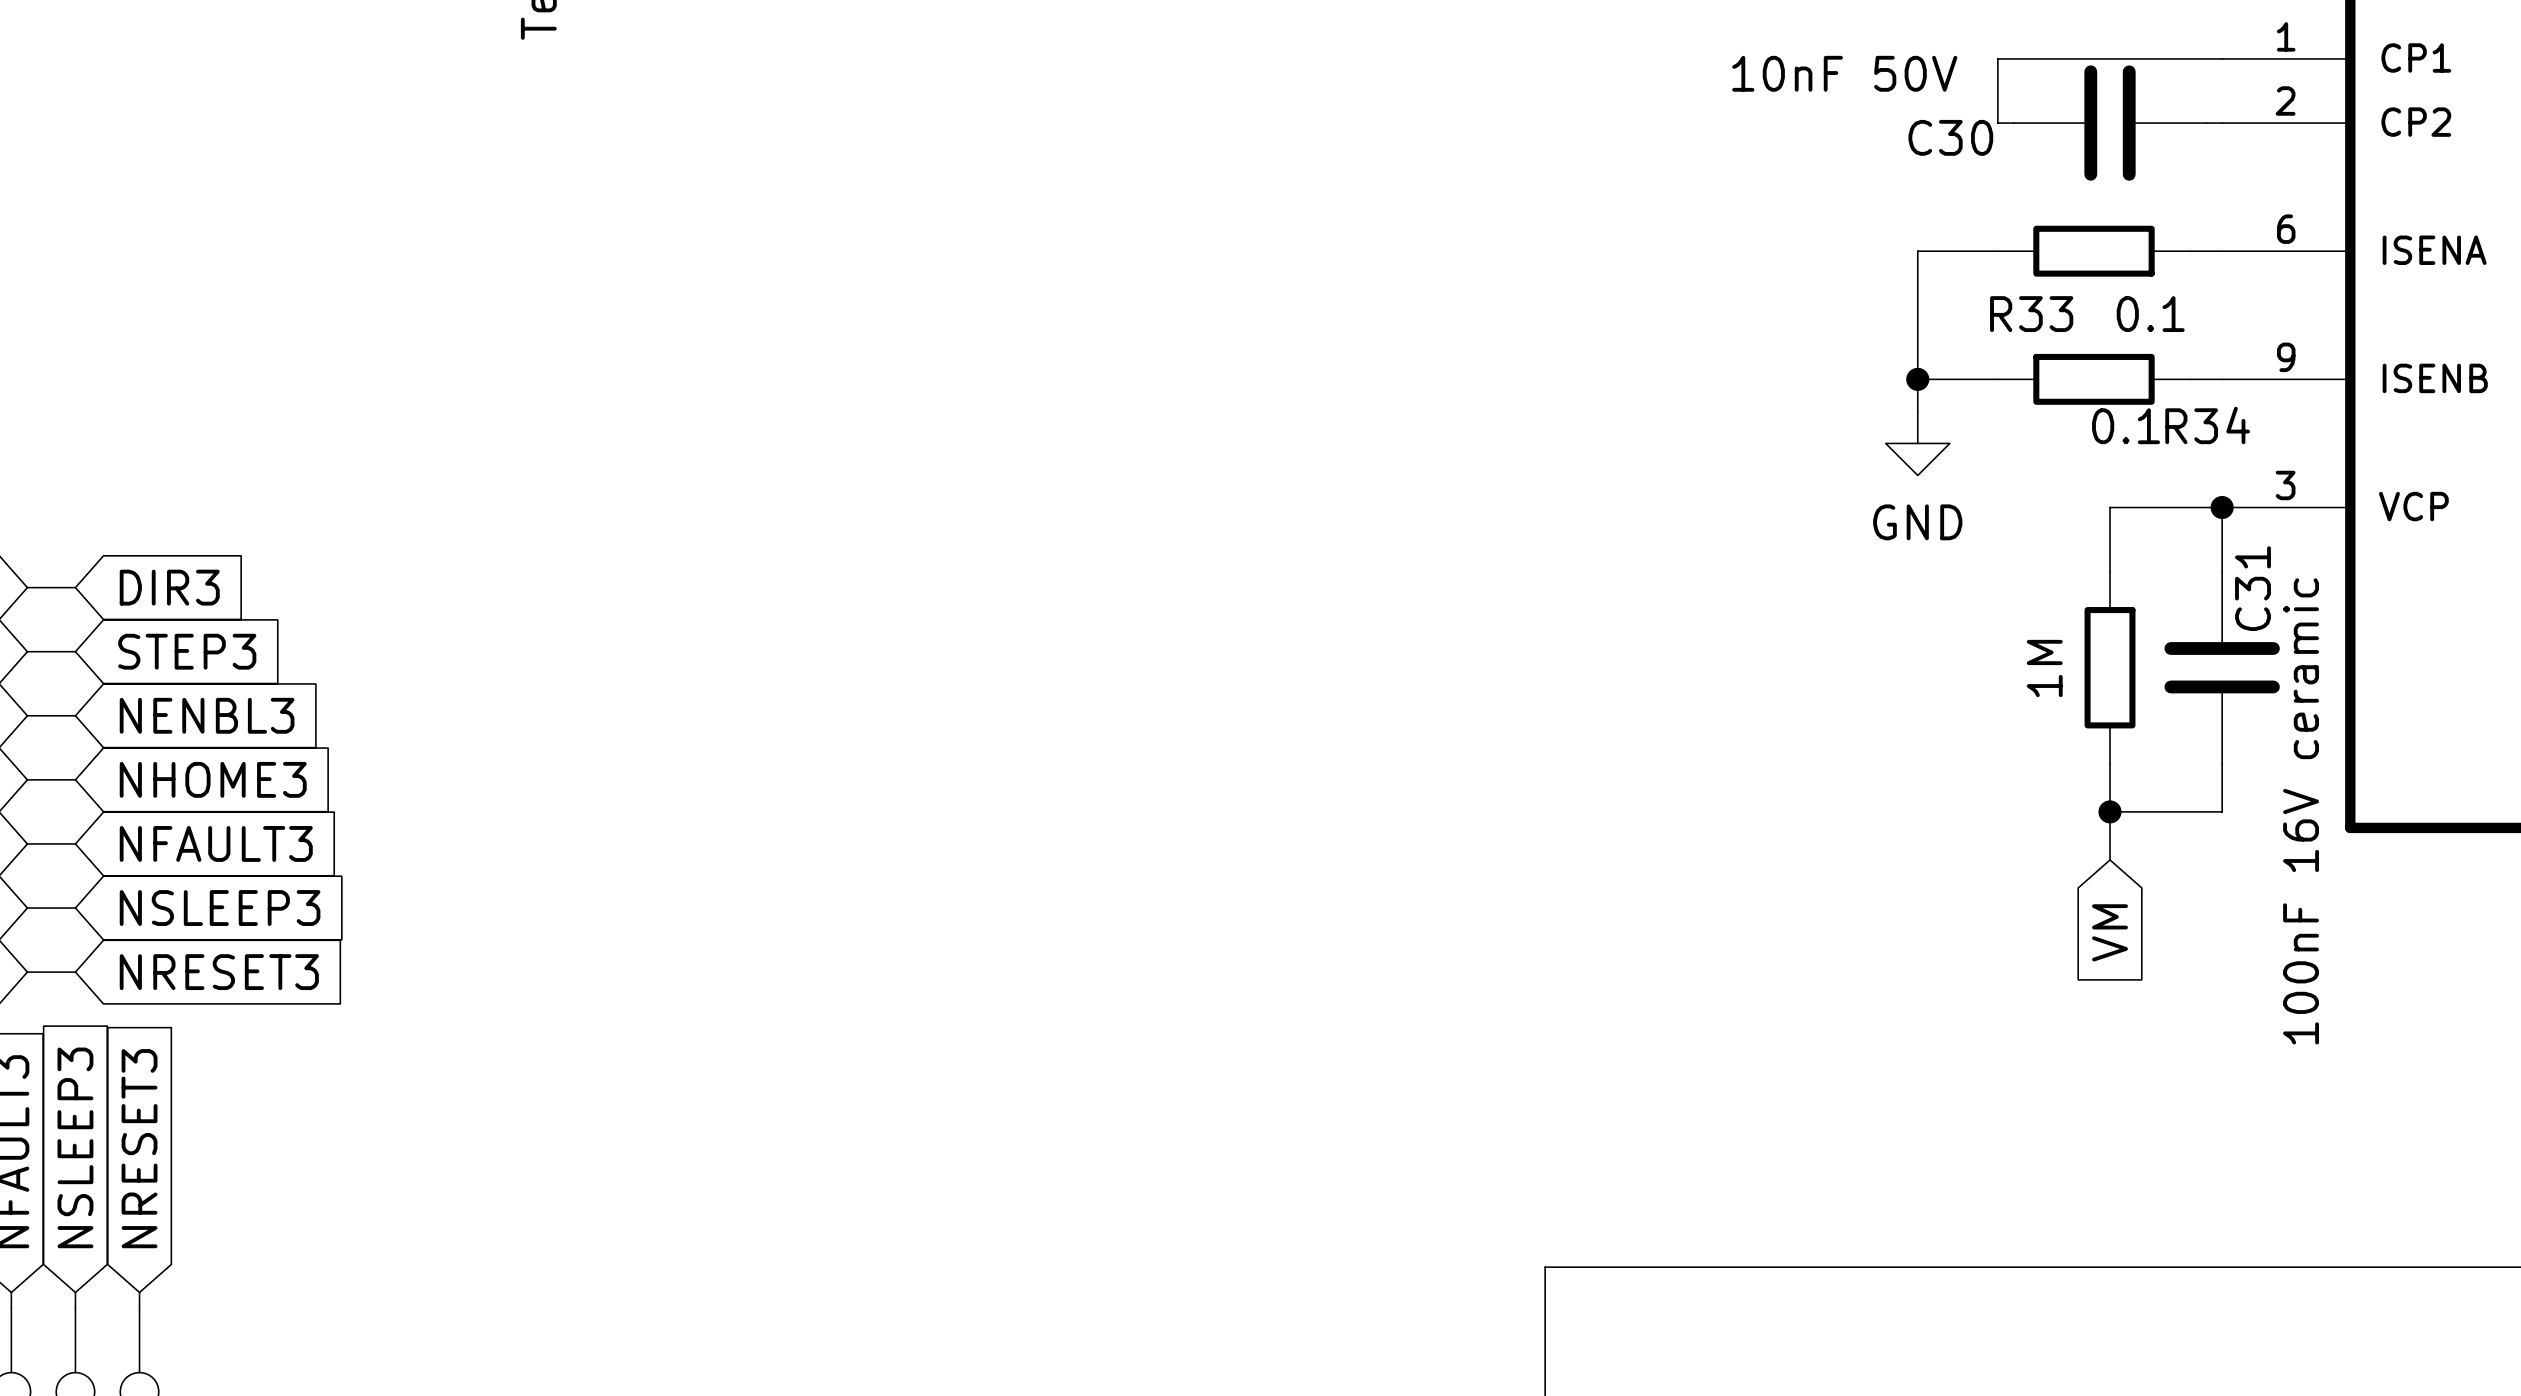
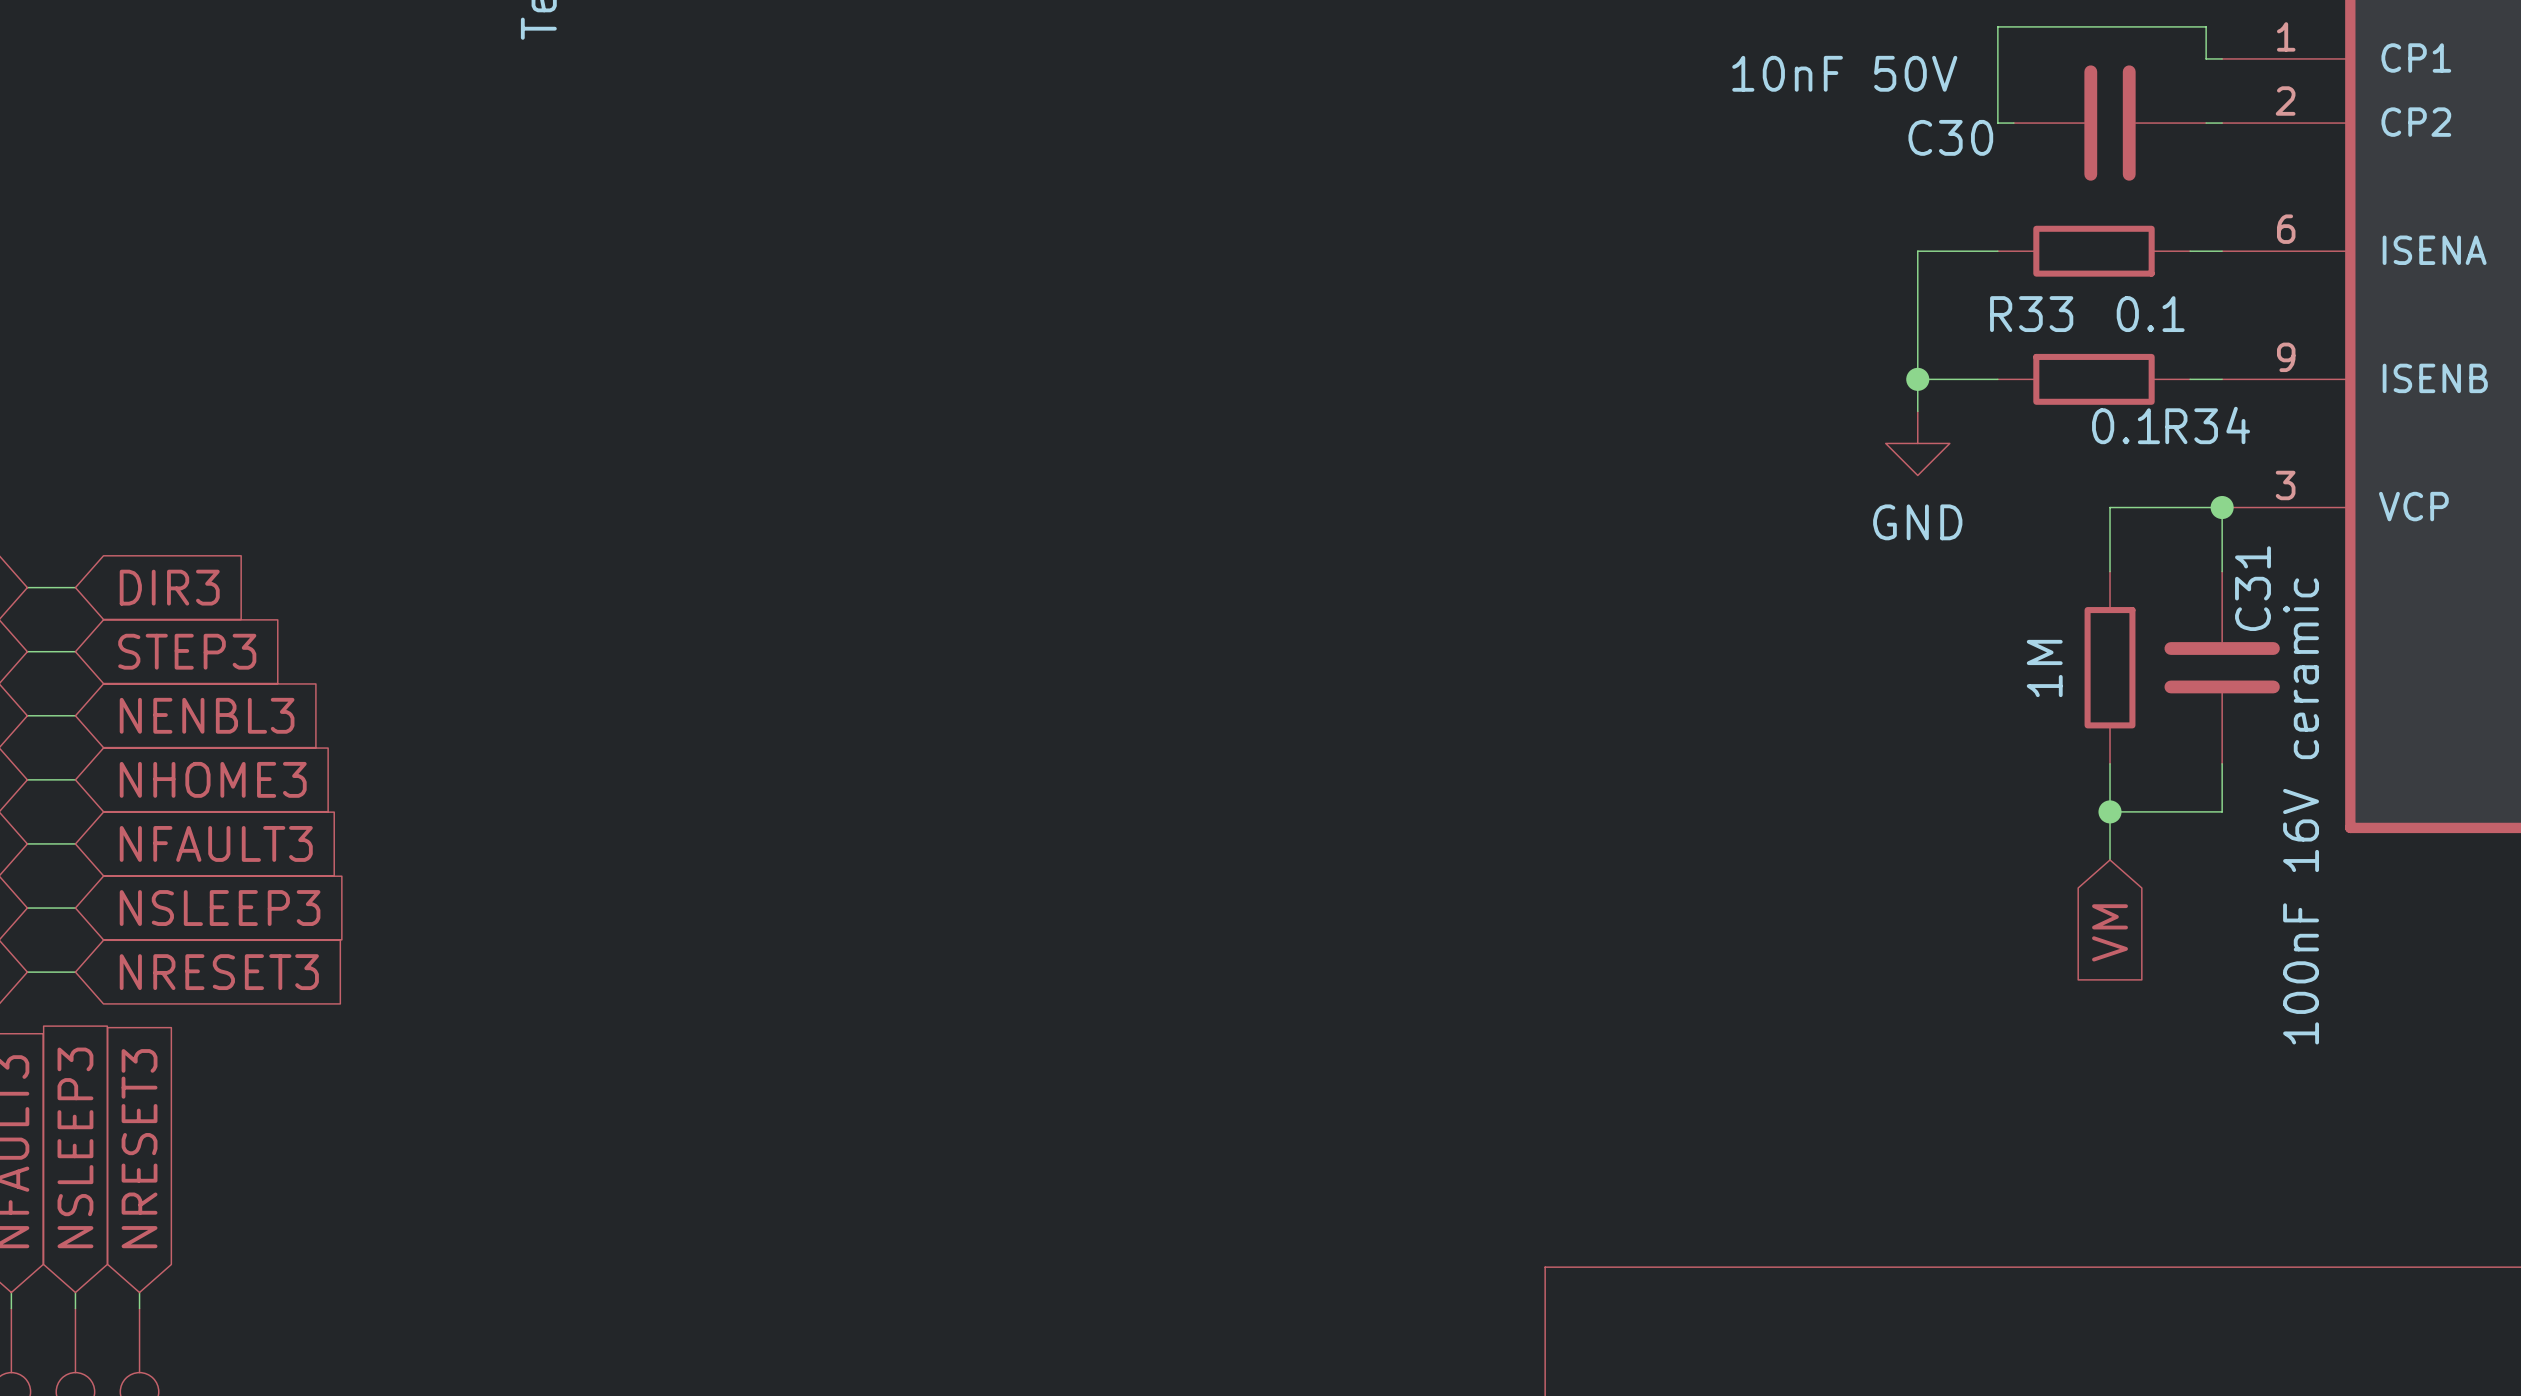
wire: (1997, 58) (2206, 58) -> (1997, 58) (1997, 26) (2206, 26) (2206, 58)

